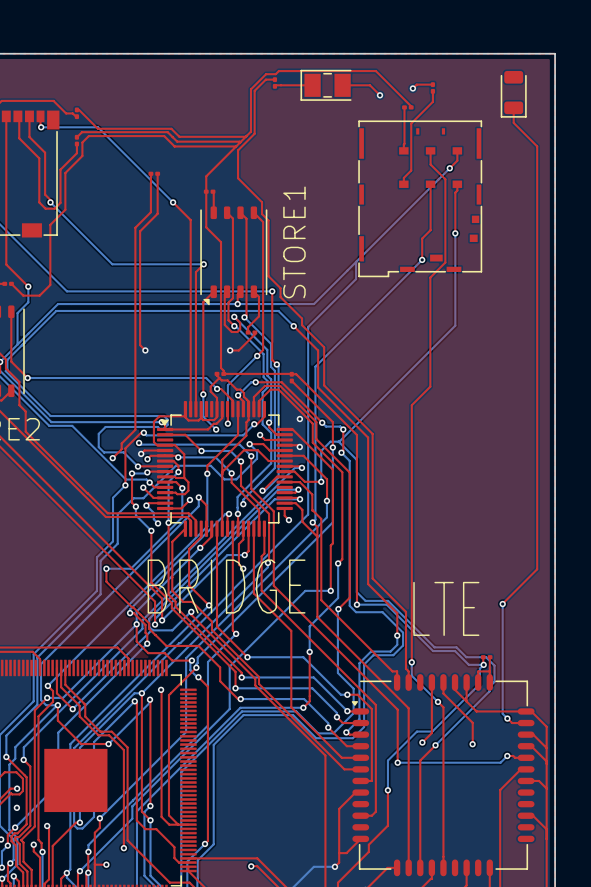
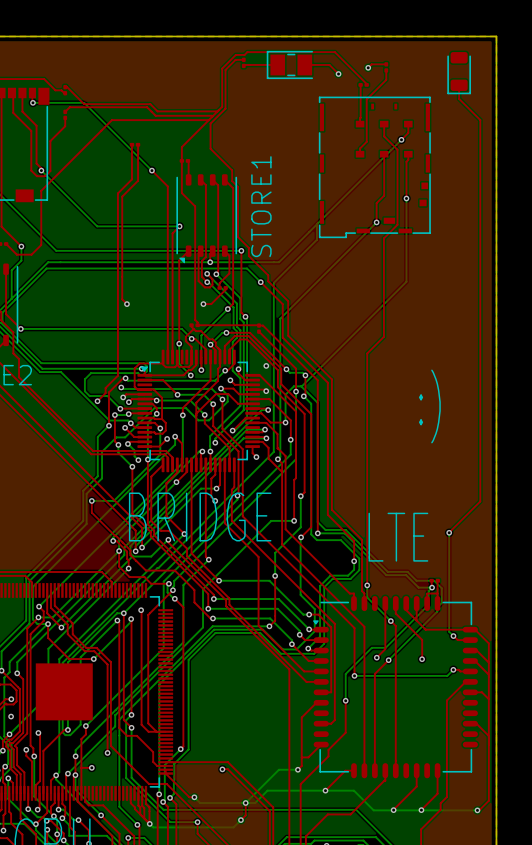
top track: (174, 146) (164, 136) (88, 136) (82, 142) (82, 155) (65, 173) (65, 209) -> (153, 120) (111, 120) (54, 177)
text: none -> :) (429, 406)

